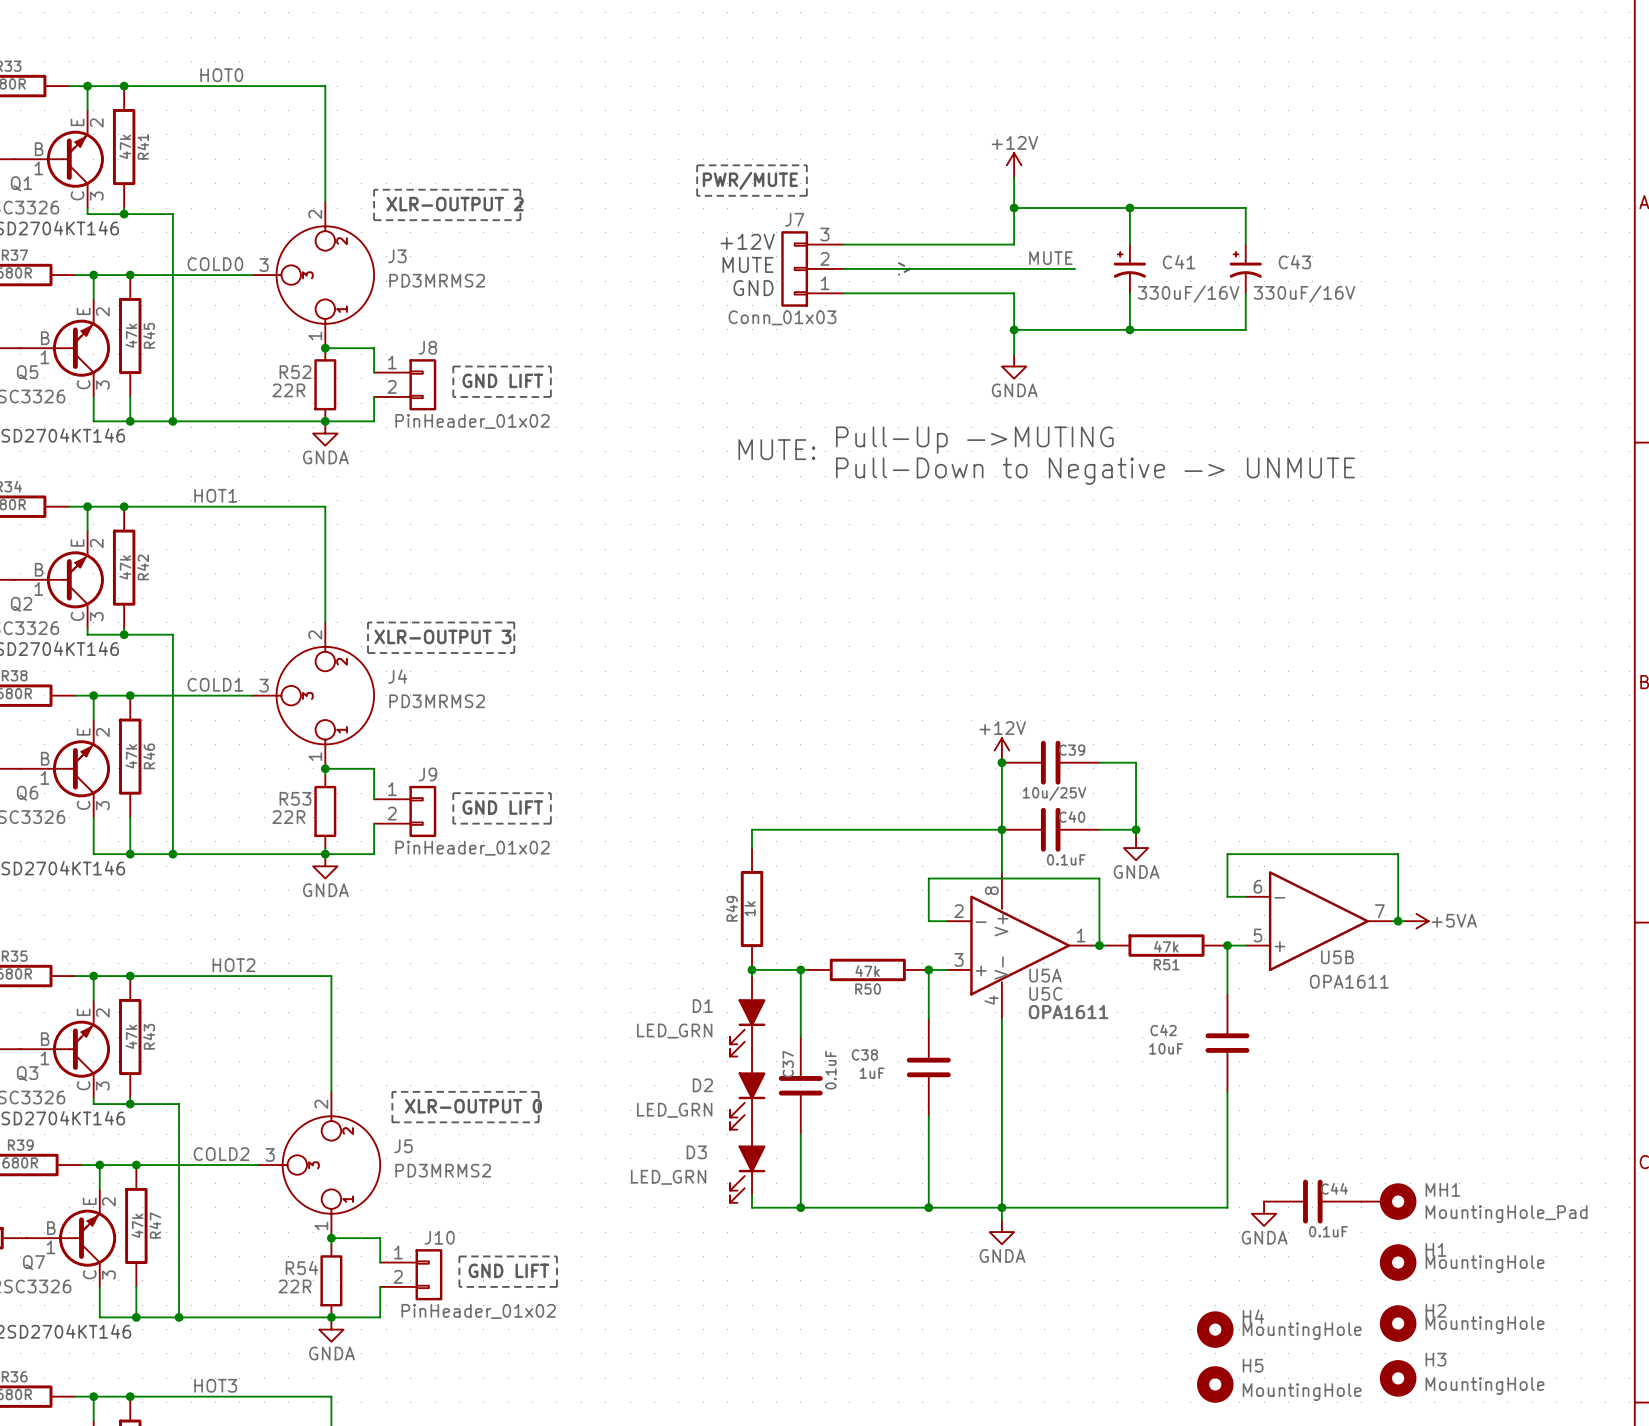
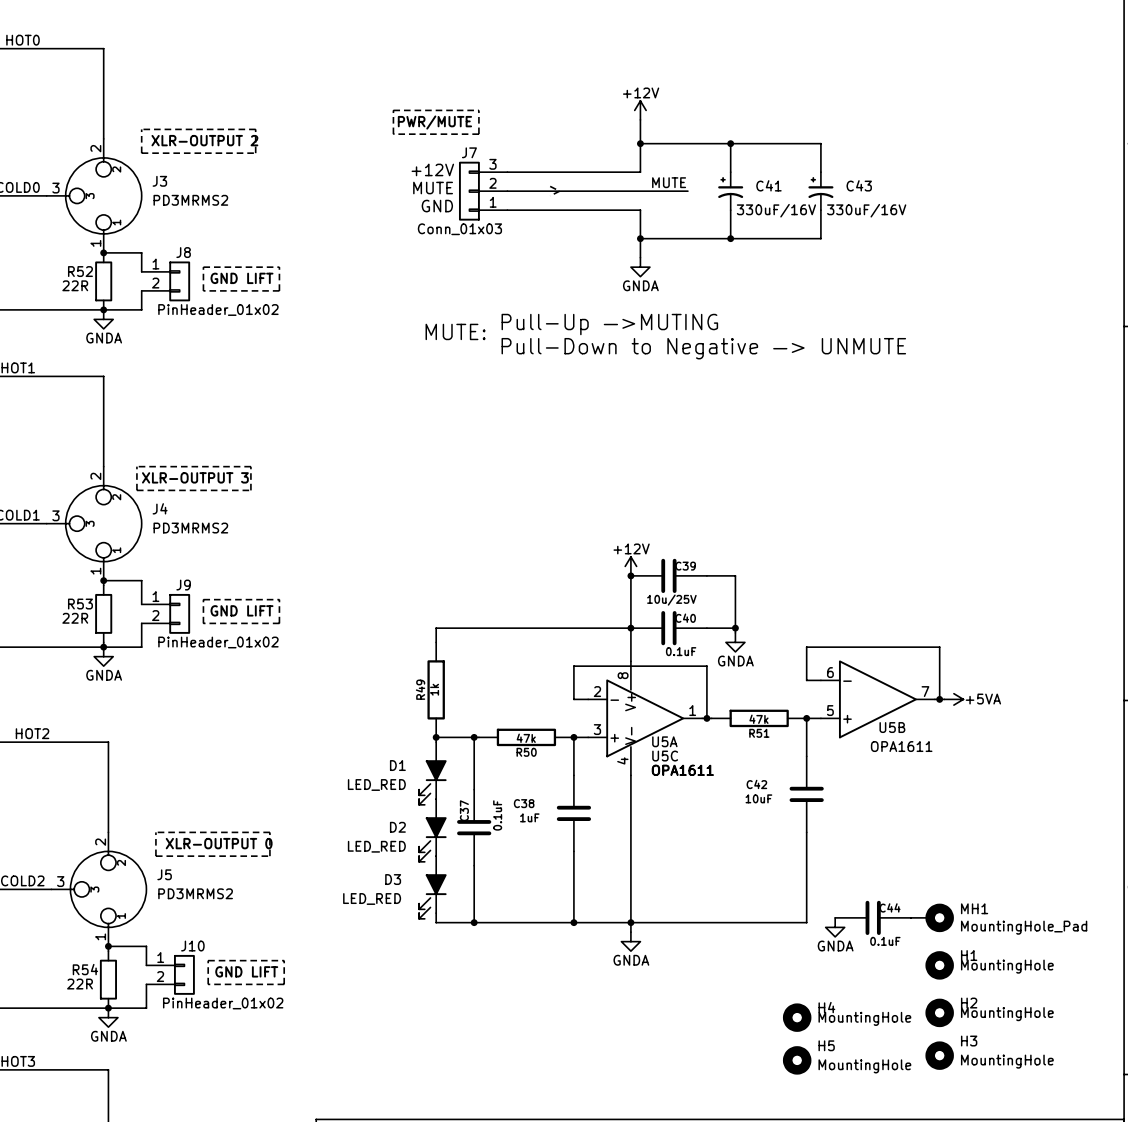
D1 value: LED_GRN (674, 1031) -> LED_RED (376, 784)
D2 value: LED_GRN (674, 1110) -> LED_RED (376, 846)
D3 value: LED_GRN (668, 1177) -> LED_RED (372, 898)

